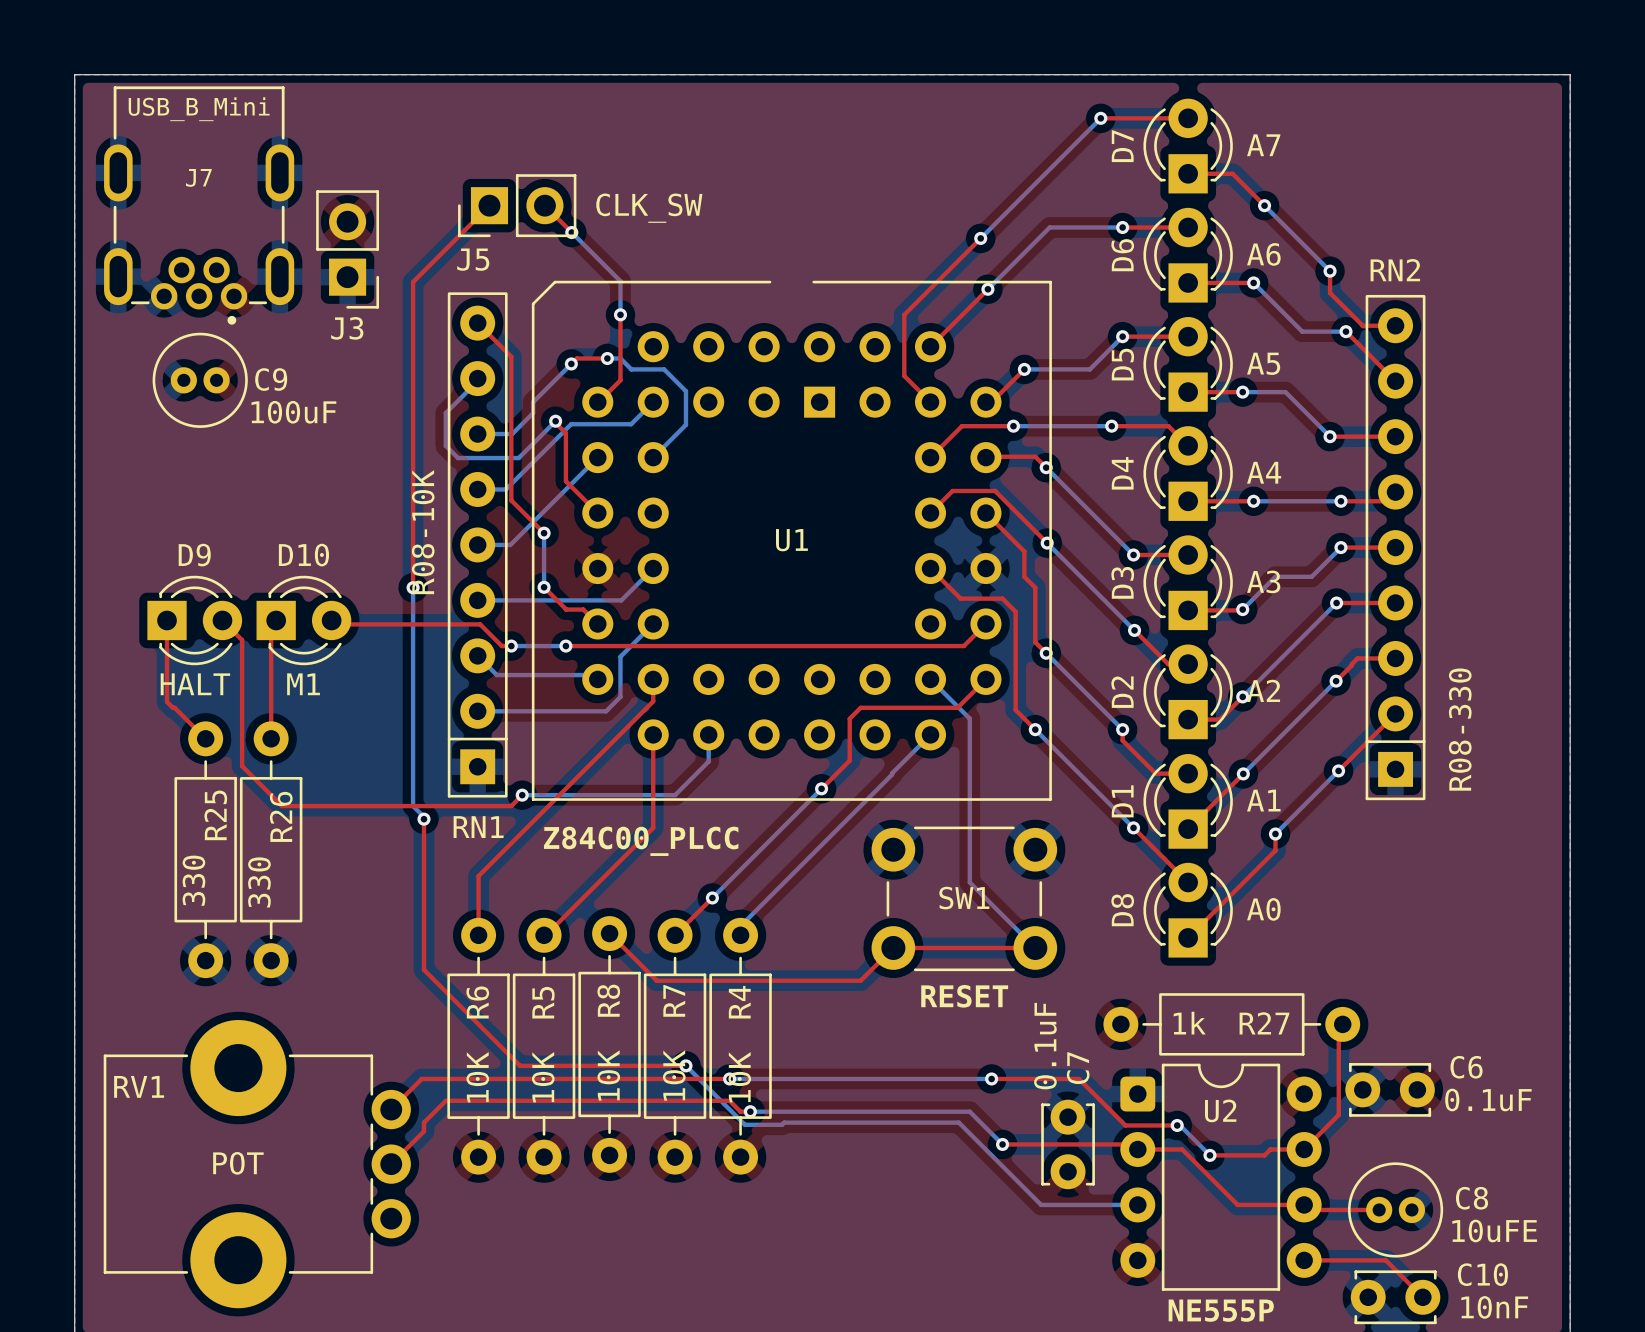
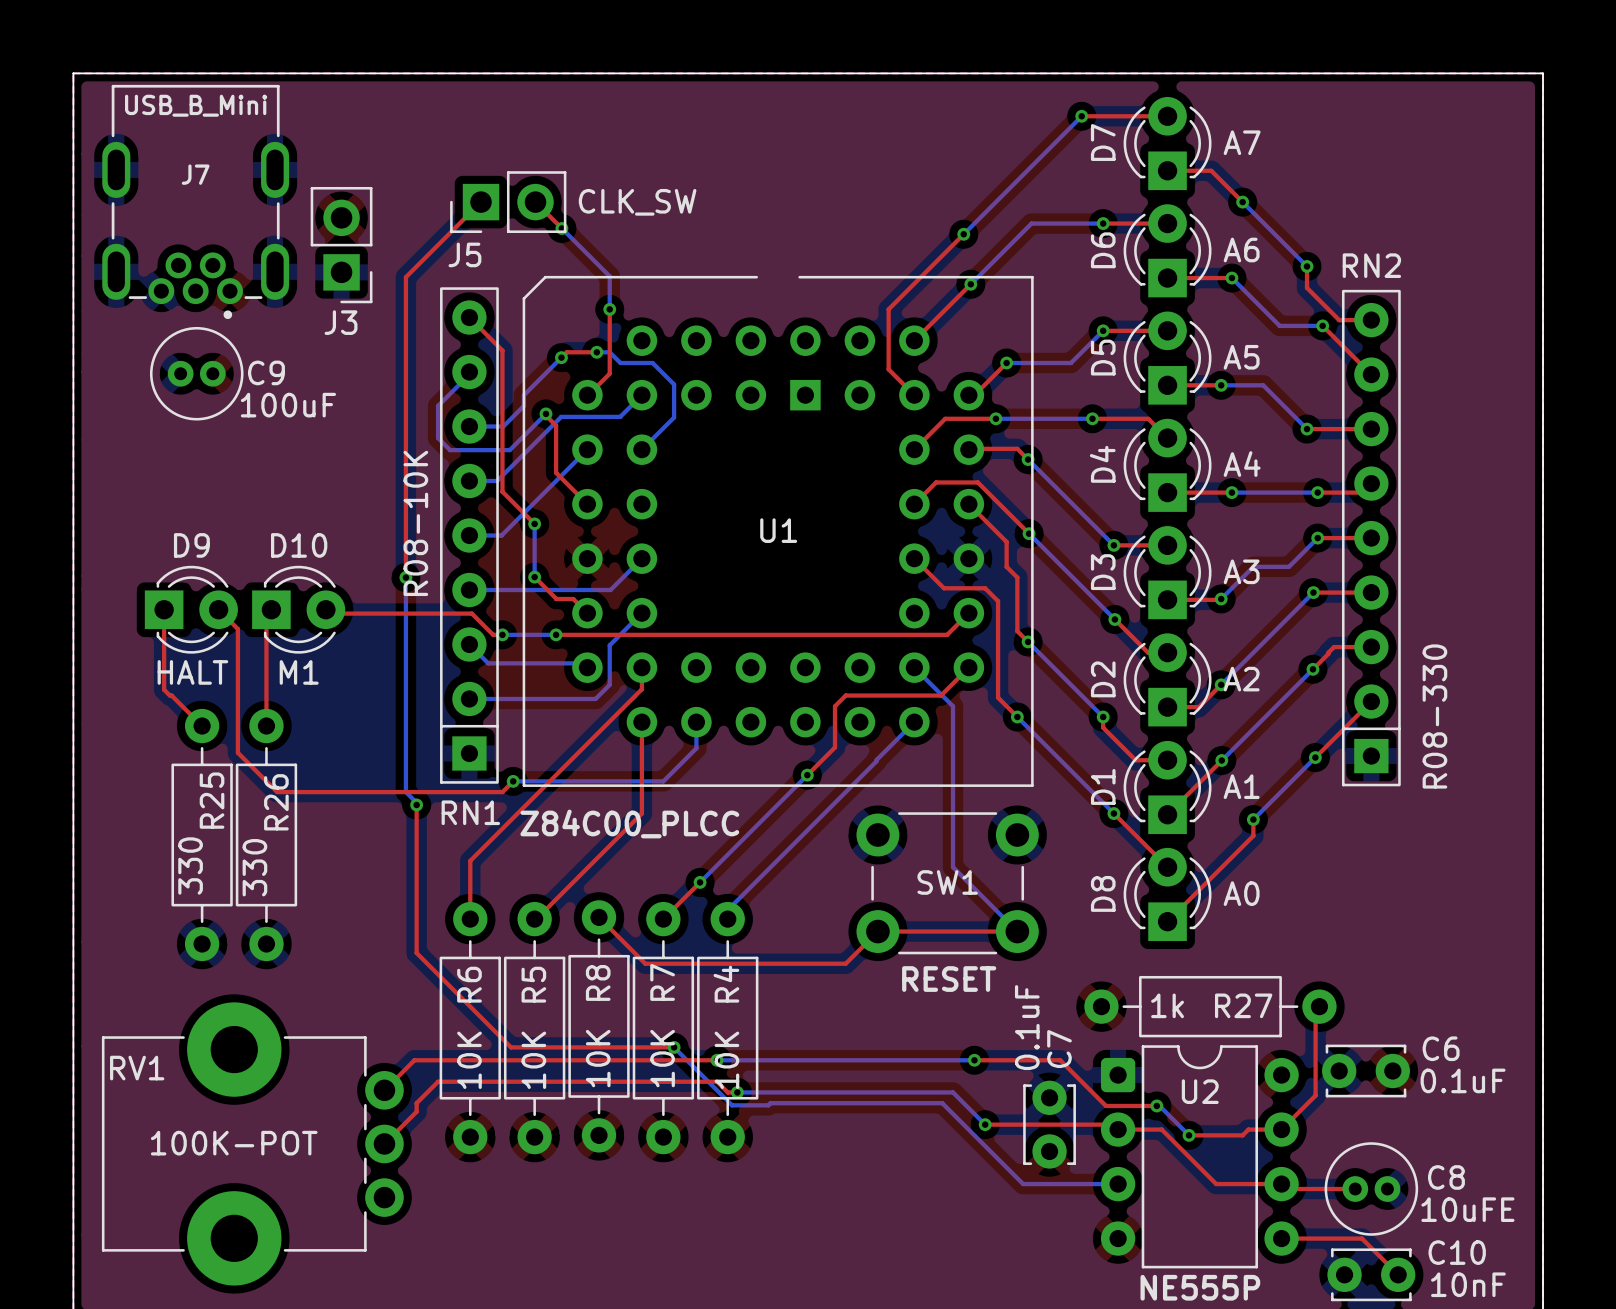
RV1 value: POT (238, 1163) -> 100K-POT (234, 1143)

